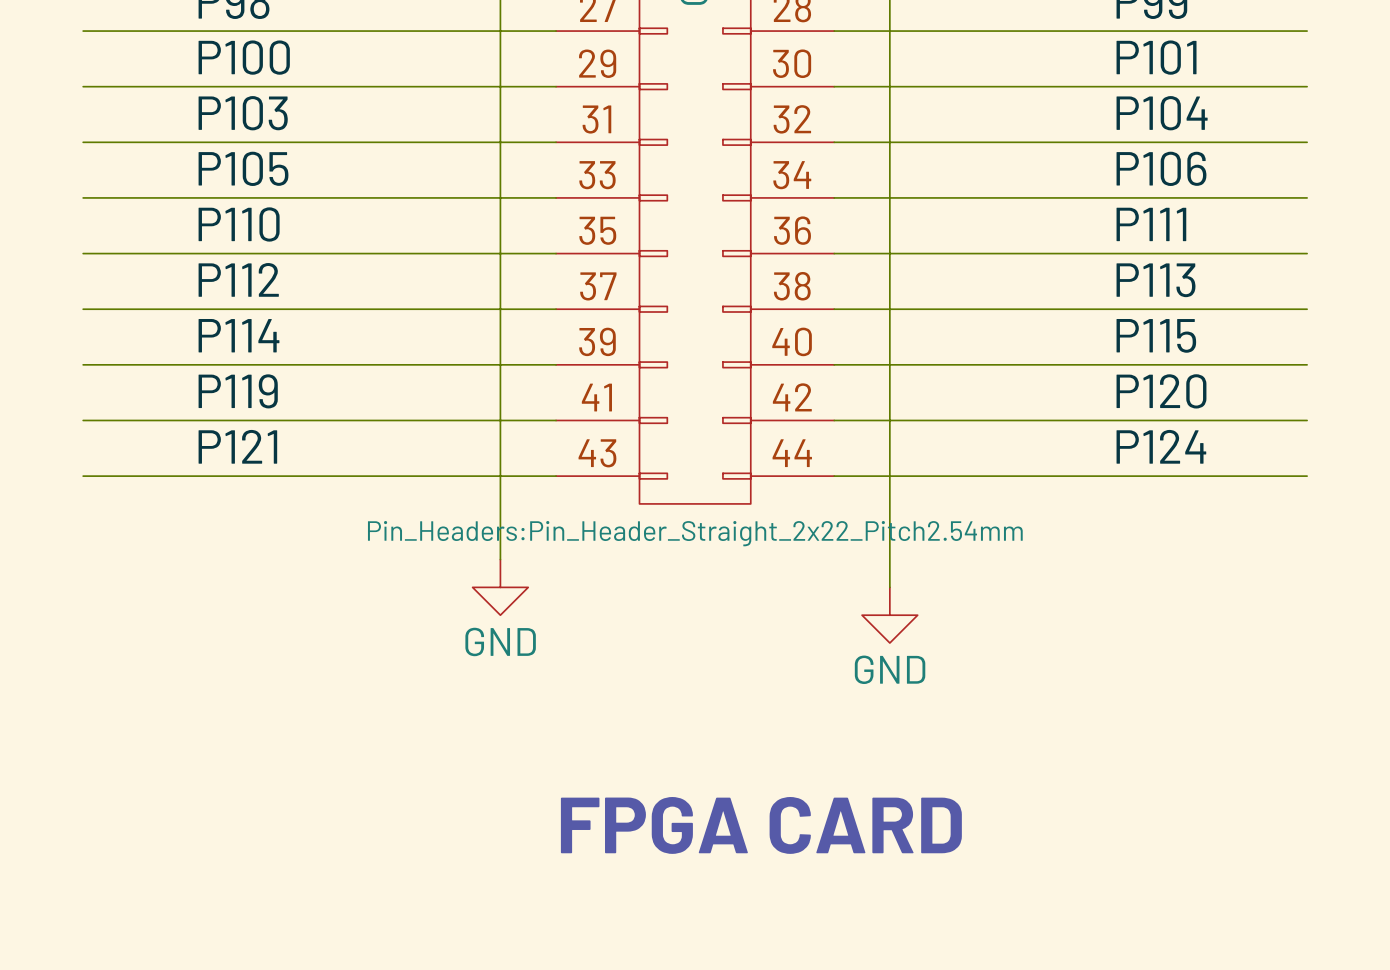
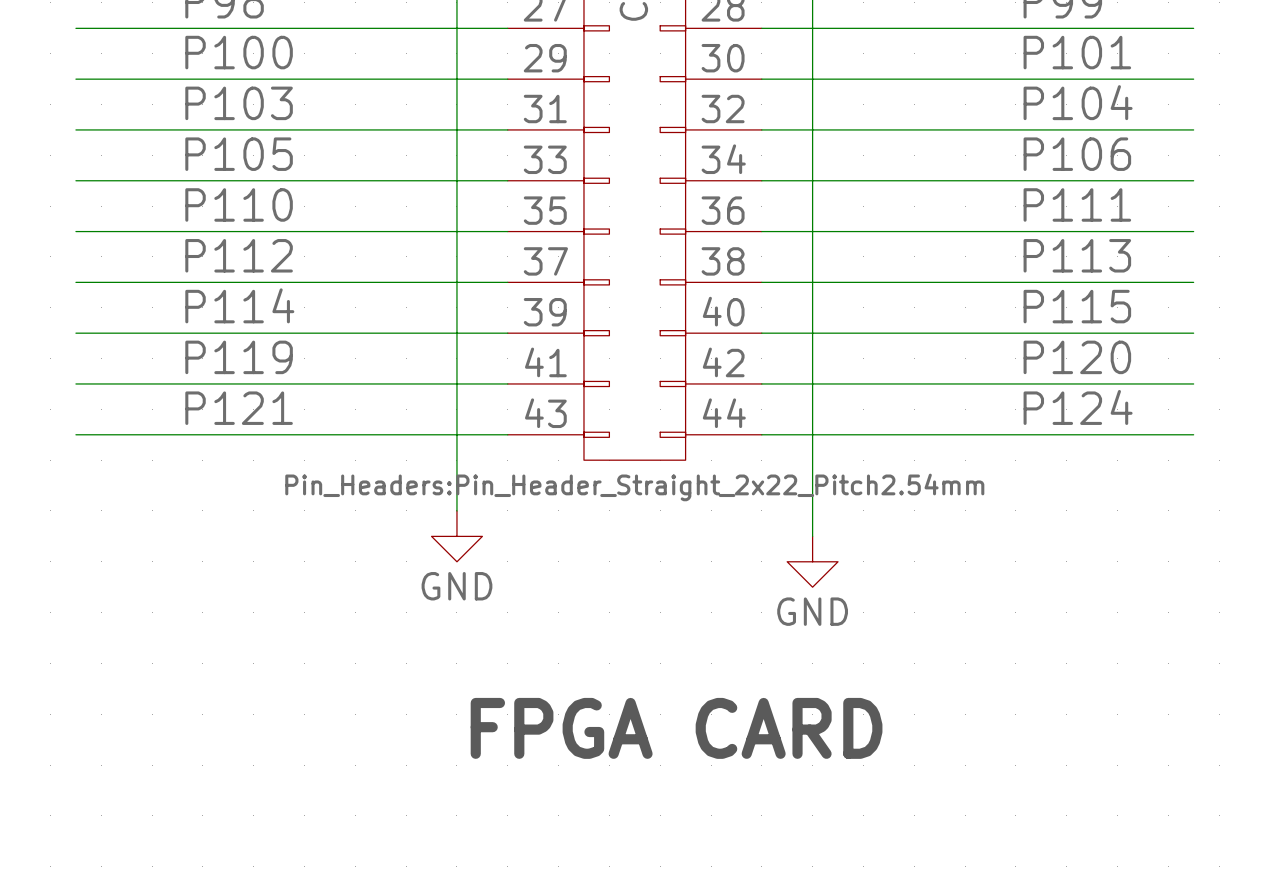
text position: FPGA CARD (761, 825) -> FPGA CARD (676, 728)

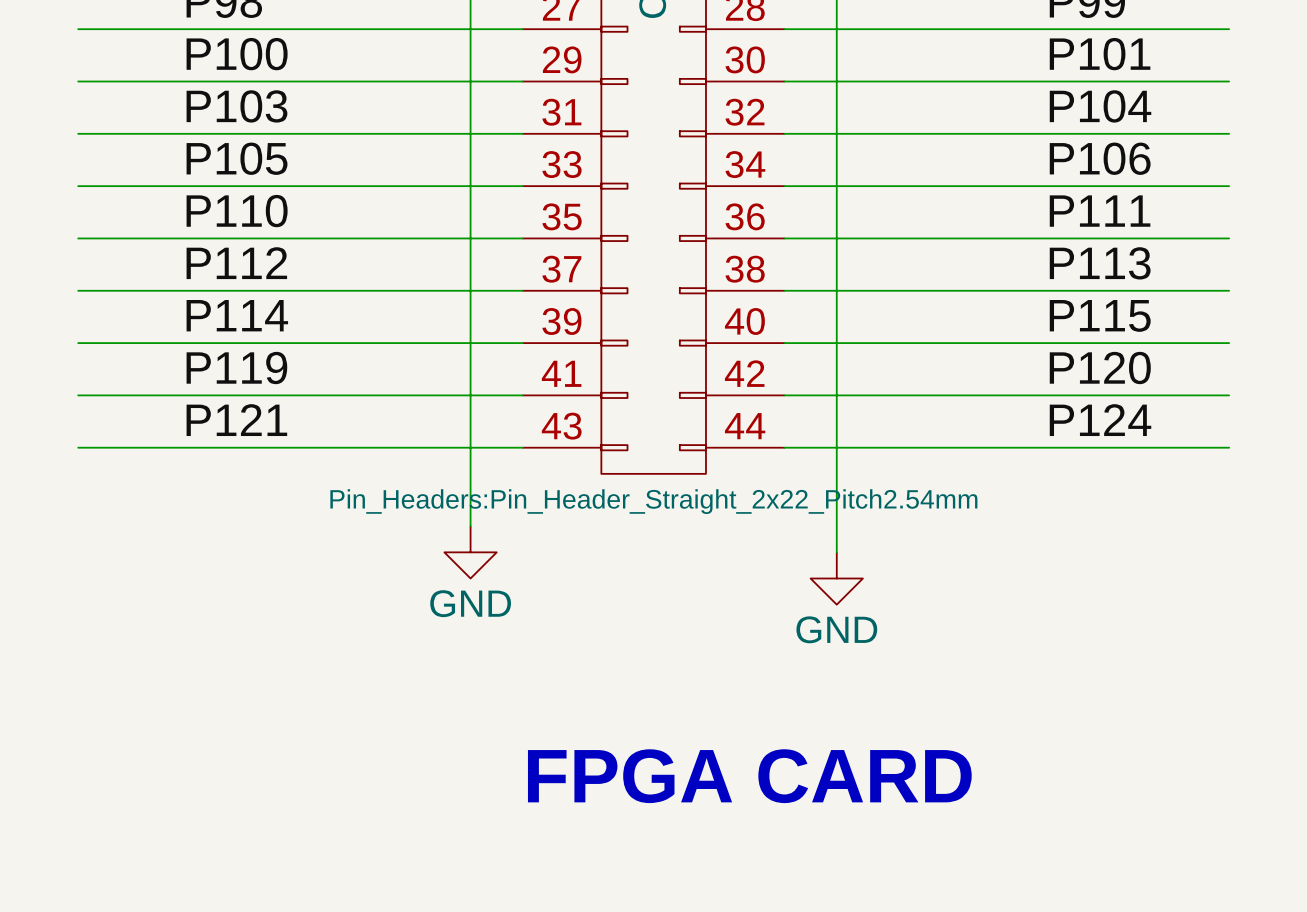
text position: FPGA CARD (676, 728) -> FPGA CARD (749, 776)

